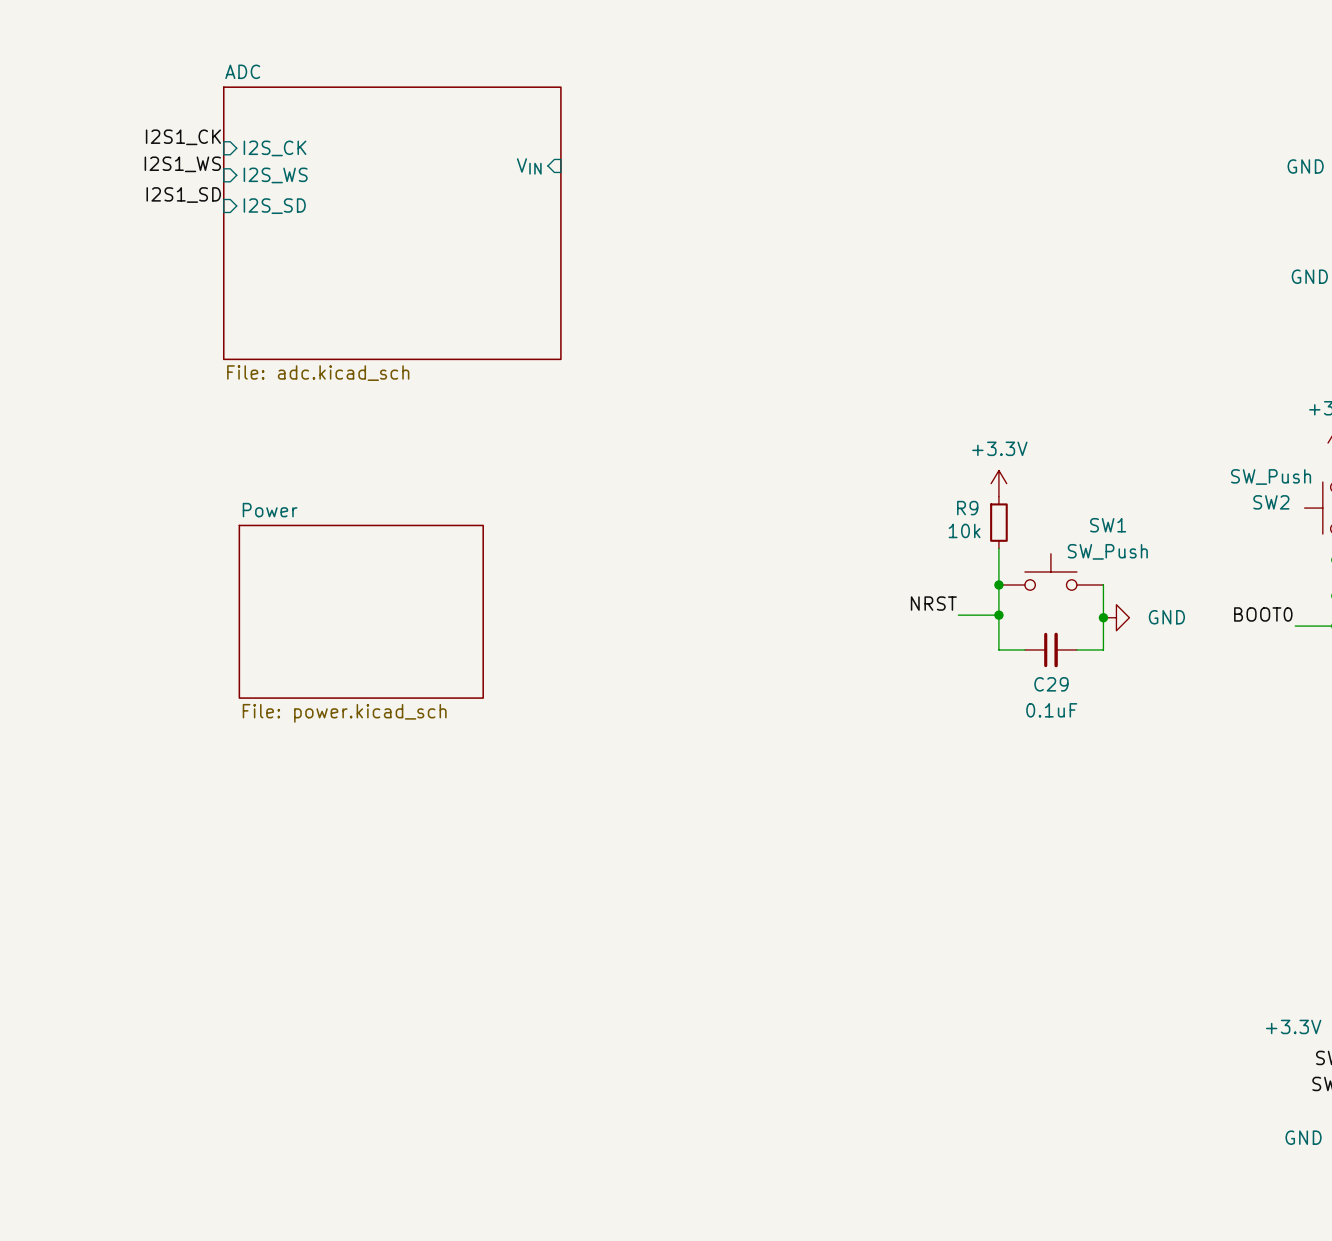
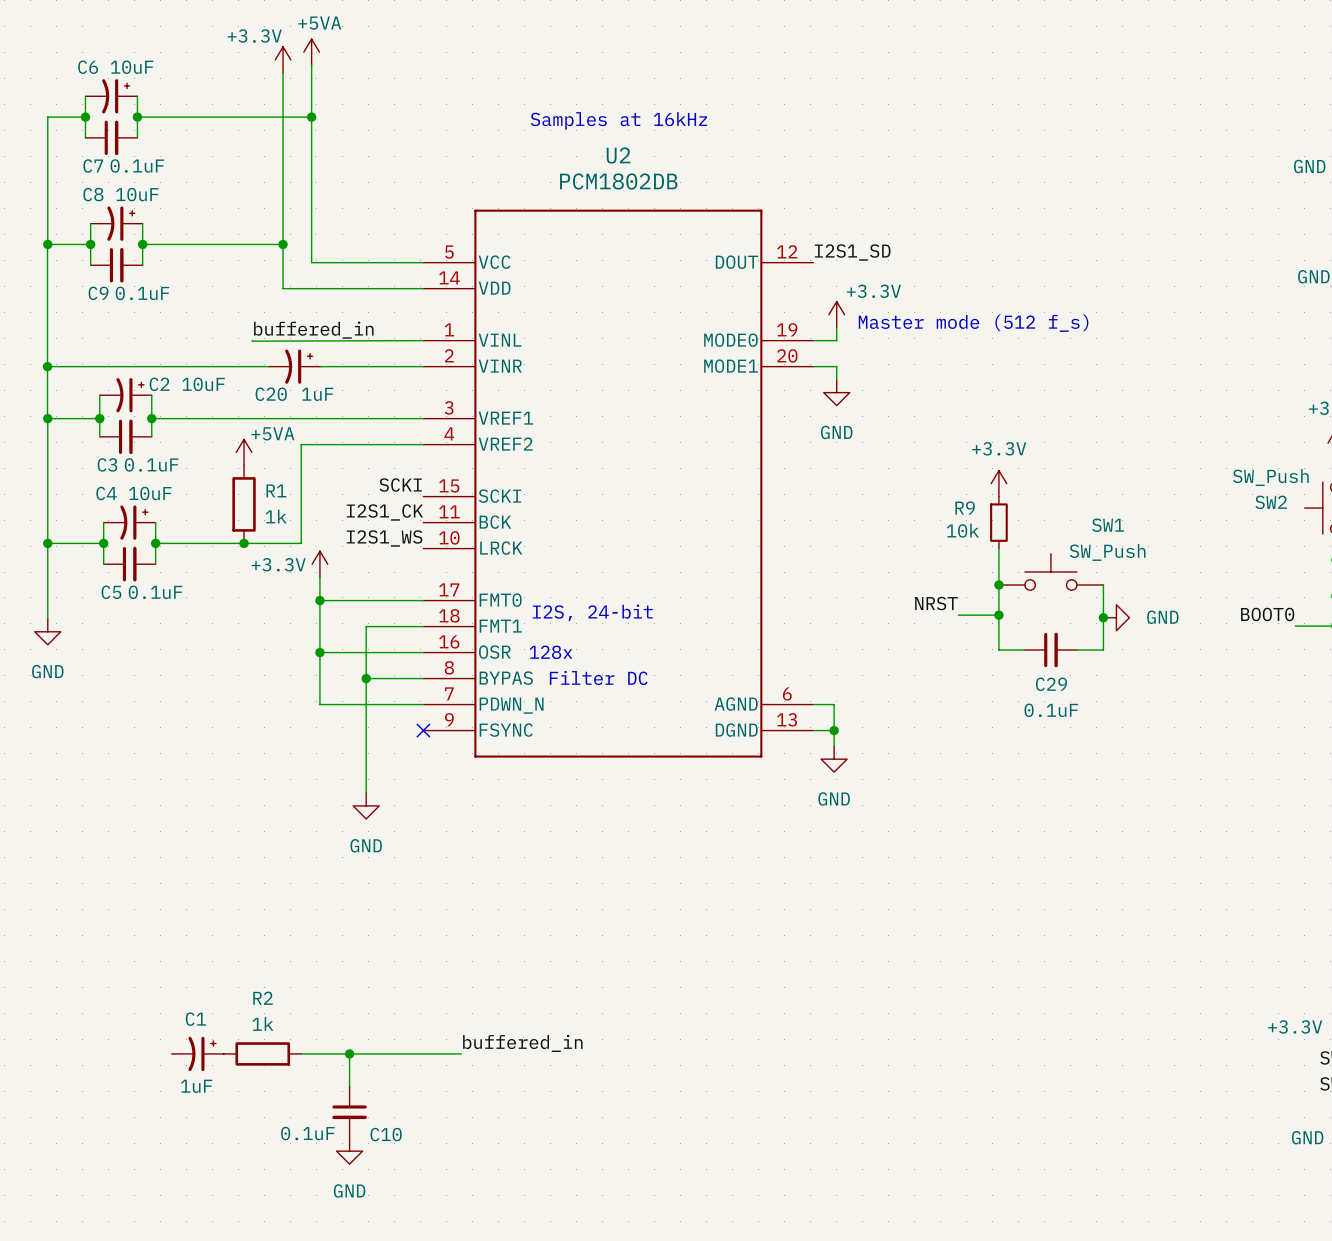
power symbol: none -> +5VA (311, 52)
power symbol: none -> +3.3V (283, 59)
wire: none -> (311, 65) (311, 262) (423, 262)
wire: none -> (283, 72) (283, 288) (423, 288)
wire: none -> (85, 96) (85, 137)
C6: none -> 10uF (111, 96)
wire: none -> (137, 96) (137, 137)
wire: none -> (85, 117) (47, 117) (47, 244)
junction: none -> (85, 117)
wire: none -> (137, 117) (311, 117)
junction: none -> (137, 117)
junction: none -> (311, 117)
text: none -> Samples at 16kHz (619, 120)
C7: none -> 0.1uF (111, 137)
label: I2S1_CK (183, 137) -> none
sheet pin: I2S_CK (275, 148) -> none
label: I2S1_WS (182, 164) -> none
sheet pin: VIN (529, 166) -> none
sheet pin: I2S_WS (275, 175) -> none
label: I2S1_SD (183, 195) -> none
sheet pin: I2S_SD (274, 206) -> none
wire: none -> (90, 223) (90, 265)
C8: none -> 10uF (116, 223)
wire: none -> (142, 223) (142, 265)
sheet ADC: File: adc.kicad_sch (392, 223) -> none
junction: none -> (47, 244)
wire: none -> (90, 244) (47, 244) (47, 418) (99, 418)
junction: none -> (90, 244)
wire: none -> (142, 244) (283, 244)
junction: none -> (142, 244)
junction: none -> (283, 244)
label: none -> I2S1_SD (852, 252)
C9: none -> 0.1uF (116, 265)
power symbol: none -> +3.3V (836, 314)
text: none -> Master mode (512 f_s) (973, 323)
wire: none -> (836, 327) (836, 340) (813, 340)
label: none -> buffered_in (313, 330)
wire: none -> (252, 340) (423, 340)
wire: none -> (47, 366) (268, 366)
junction: none -> (47, 366)
C20: none -> 1uF (294, 366)
wire: none -> (320, 366) (423, 366)
wire: none -> (813, 366) (836, 366) (836, 379)
power symbol: none -> GND (836, 392)
wire: none -> (99, 395) (99, 436)
C2: none -> 10uF (125, 395)
wire: none -> (151, 395) (151, 436)
wire: none -> (47, 418) (47, 618)
junction: none -> (47, 418)
junction: none -> (99, 418)
wire: none -> (151, 418) (423, 418)
junction: none -> (151, 418)
C3: none -> 0.1uF (125, 436)
wire: none -> (423, 444) (301, 444) (301, 543) (155, 543)
power symbol: none -> +5VA (244, 452)
U2: none -> PCM1802DB (618, 483)
label: none -> SCKI (400, 485)
R1: none -> 1k (244, 504)
label: none -> I2S1_CK (384, 512)
wire: none -> (103, 522) (103, 564)
C4: none -> 10uF (129, 522)
wire: none -> (155, 522) (155, 564)
label: none -> I2S1_WS (384, 538)
wire: none -> (47, 543) (103, 543)
junction: none -> (47, 543)
junction: none -> (103, 543)
junction: none -> (155, 543)
junction: none -> (244, 543)
C5: none -> 0.1uF (129, 564)
power symbol: none -> +3.3V (319, 564)
wire: none -> (319, 577) (319, 704) (423, 704)
wire: none -> (319, 600) (423, 600)
junction: none -> (319, 600)
sheet Power: File: power.kicad_sch (361, 611) -> none
text: none -> I2S, 24-bit (592, 612)
wire: none -> (423, 626) (366, 626) (366, 792)
power symbol: none -> GND (47, 631)
wire: none -> (319, 652) (423, 652)
junction: none -> (319, 652)
text: none -> 128x (550, 652)
wire: none -> (366, 678) (423, 678)
junction: none -> (366, 678)
text: none -> Filter DC (598, 677)
wire: none -> (813, 704) (834, 704) (834, 746)
no-connect mark: none -> (423, 730)
wire: none -> (813, 730) (834, 730)
junction: none -> (834, 730)
power symbol: none -> GND (834, 759)
power symbol: none -> GND (366, 805)
label: none -> buffered_in (522, 1043)
C1: none -> 1uF (197, 1053)
R2: none -> 1k (262, 1053)
wire: none -> (301, 1053) (461, 1053)
wire: none -> (349, 1053) (349, 1086)
junction: none -> (349, 1053)
C10: none -> 0.1uF (349, 1112)
power symbol: none -> GND (349, 1151)

